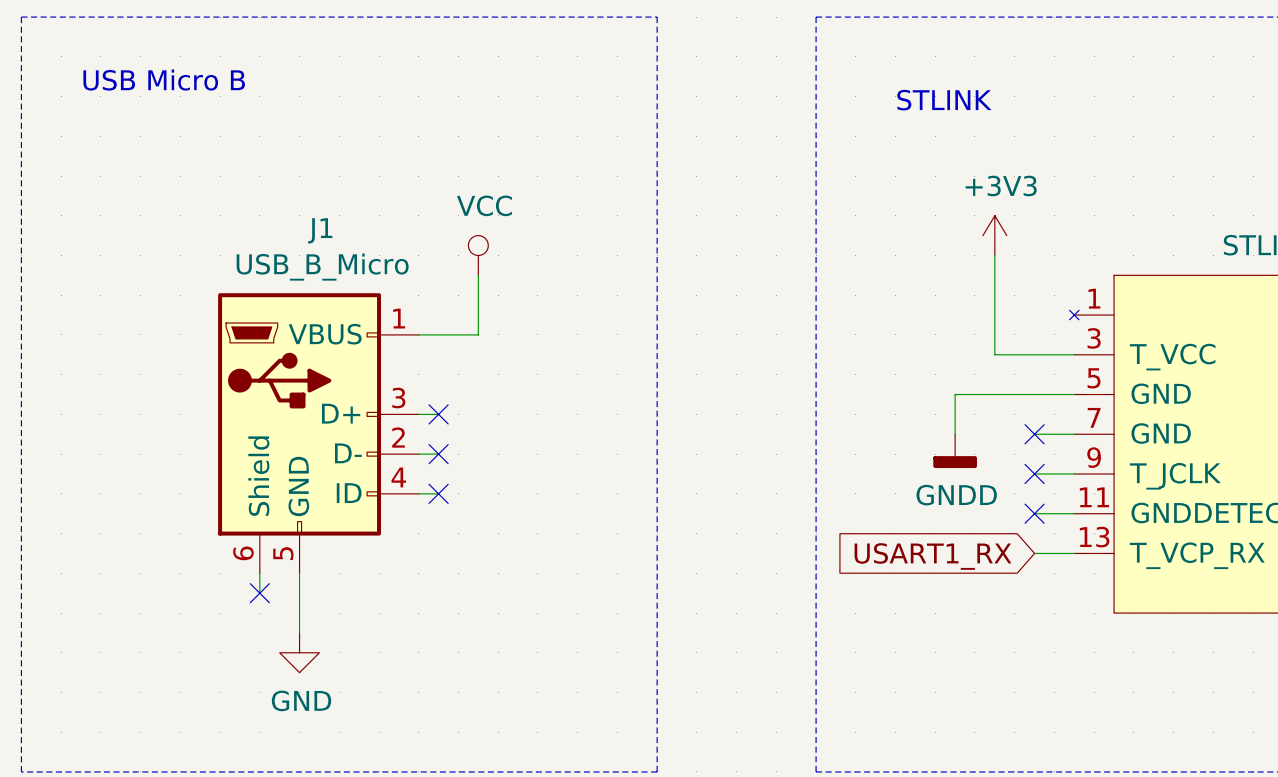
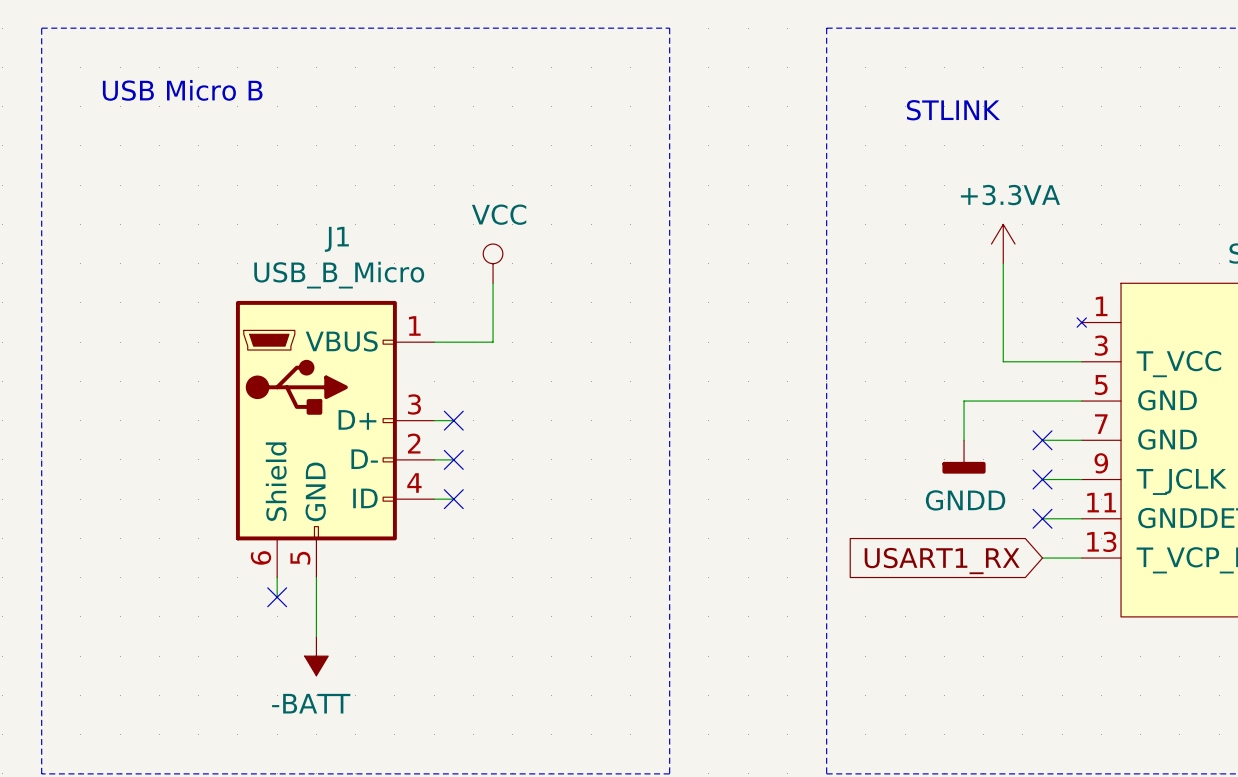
power symbol: +3V3 (994, 235) -> +3.3VA (1003, 244)
power symbol: GND (299, 652) -> -BATT (316, 656)

